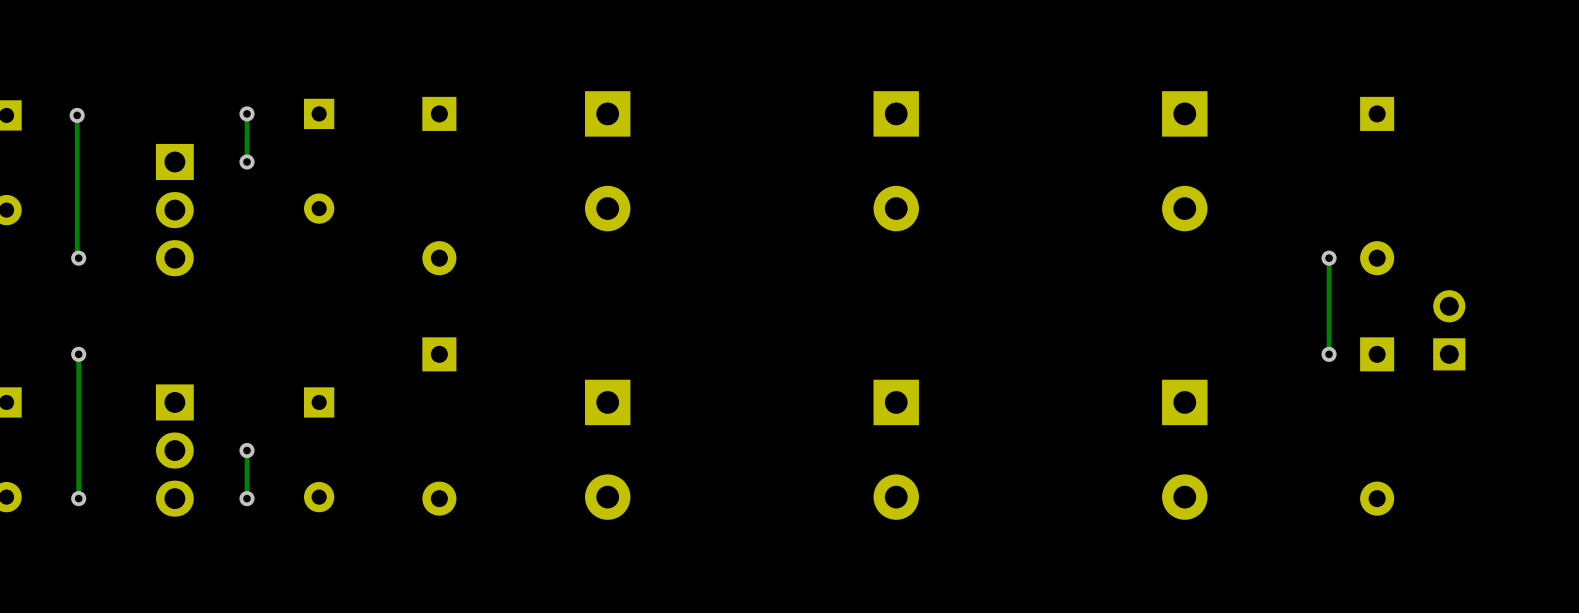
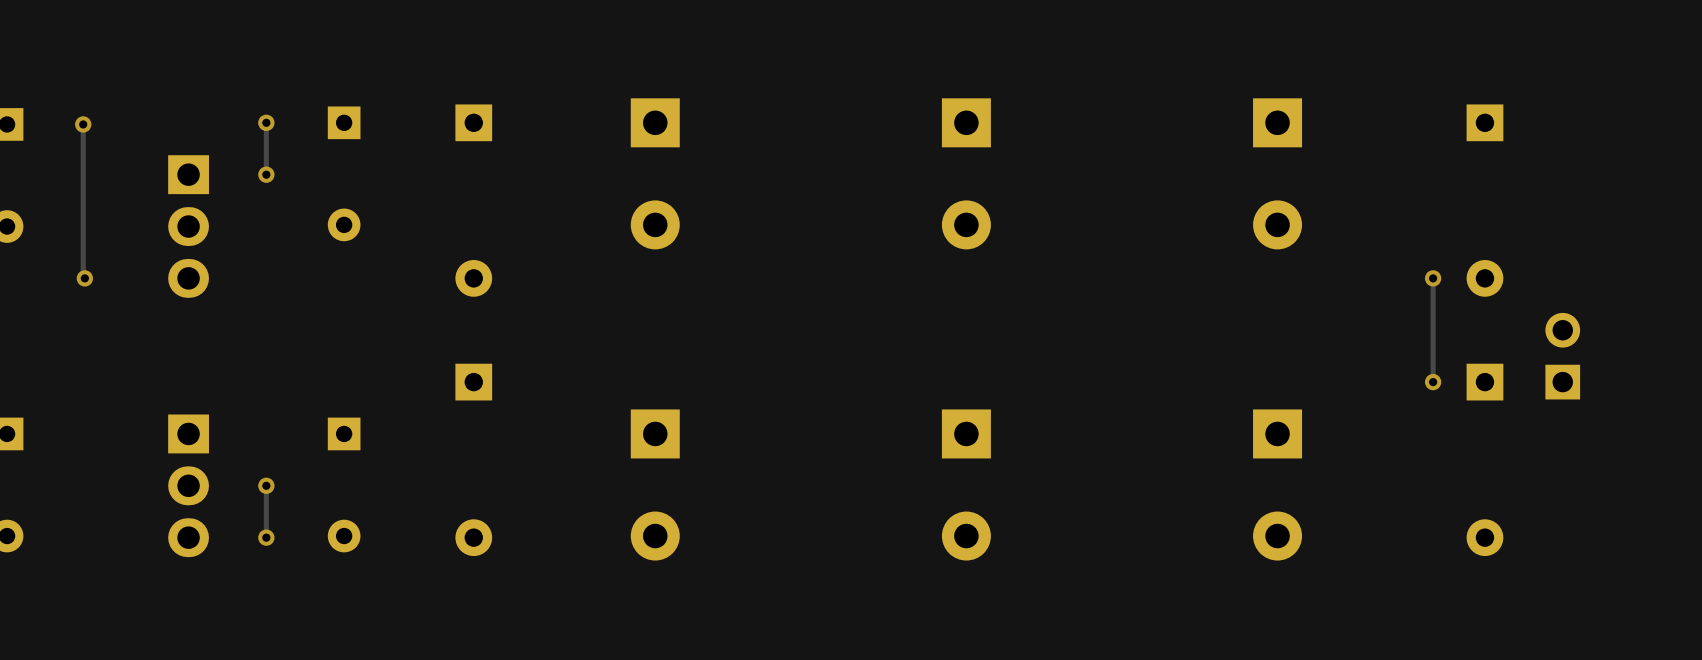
track: (78, 354) (78, 498) -> none
via: (78, 354) -> none
via: (78, 498) -> none

